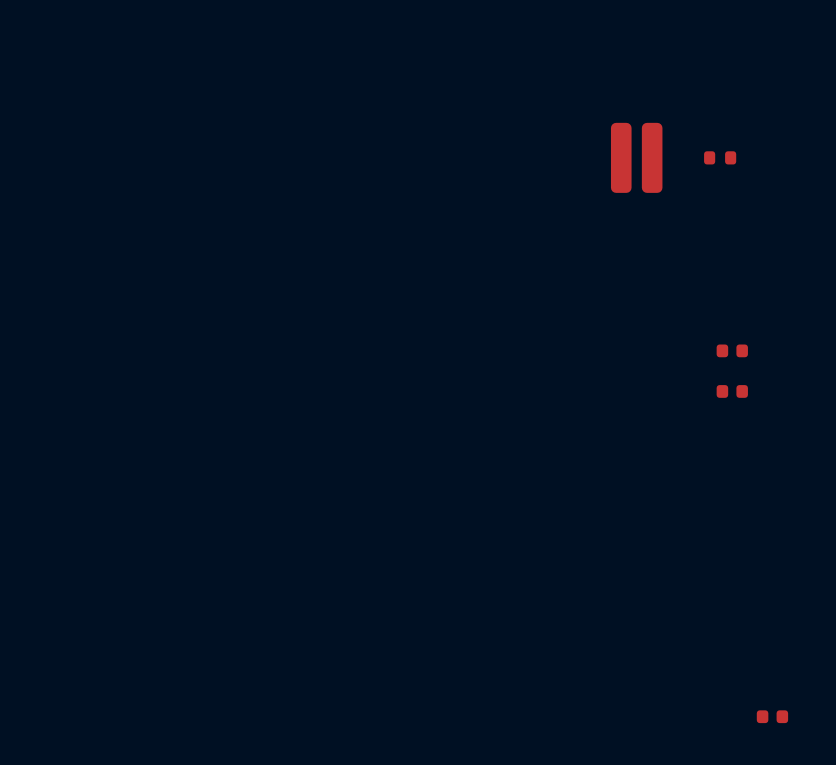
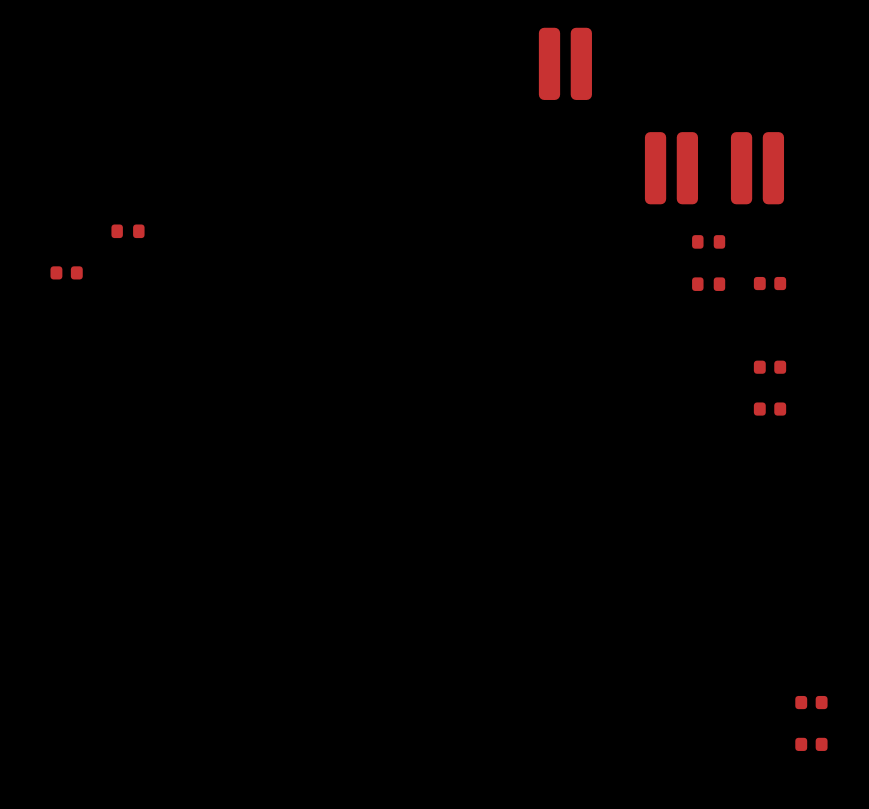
part: none -> (565, 63)
part footprint: [704, 151, 737, 165] -> [730, 132, 785, 205]
part: none -> (127, 231)
part: none -> (708, 241)
part: none -> (66, 272)
part: none -> (770, 283)
part: none -> (708, 284)
part: none -> (811, 702)

